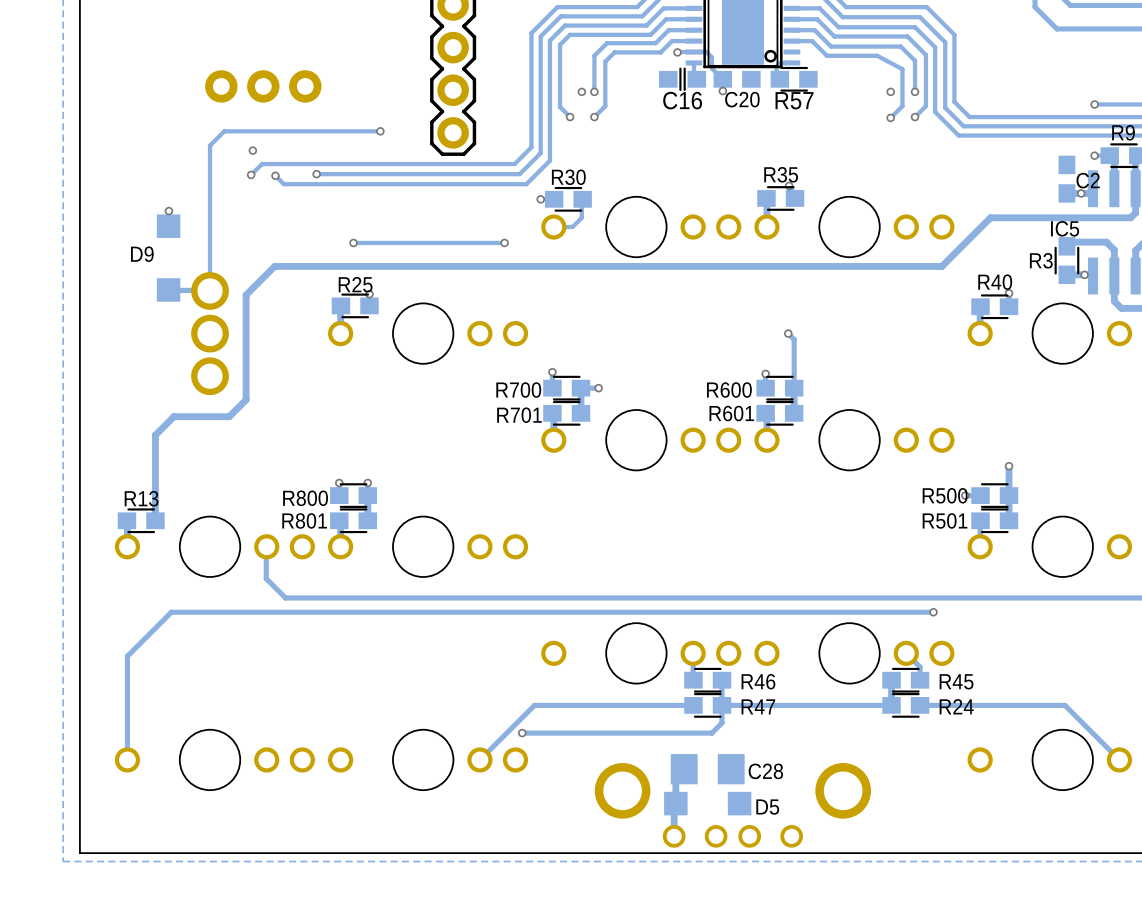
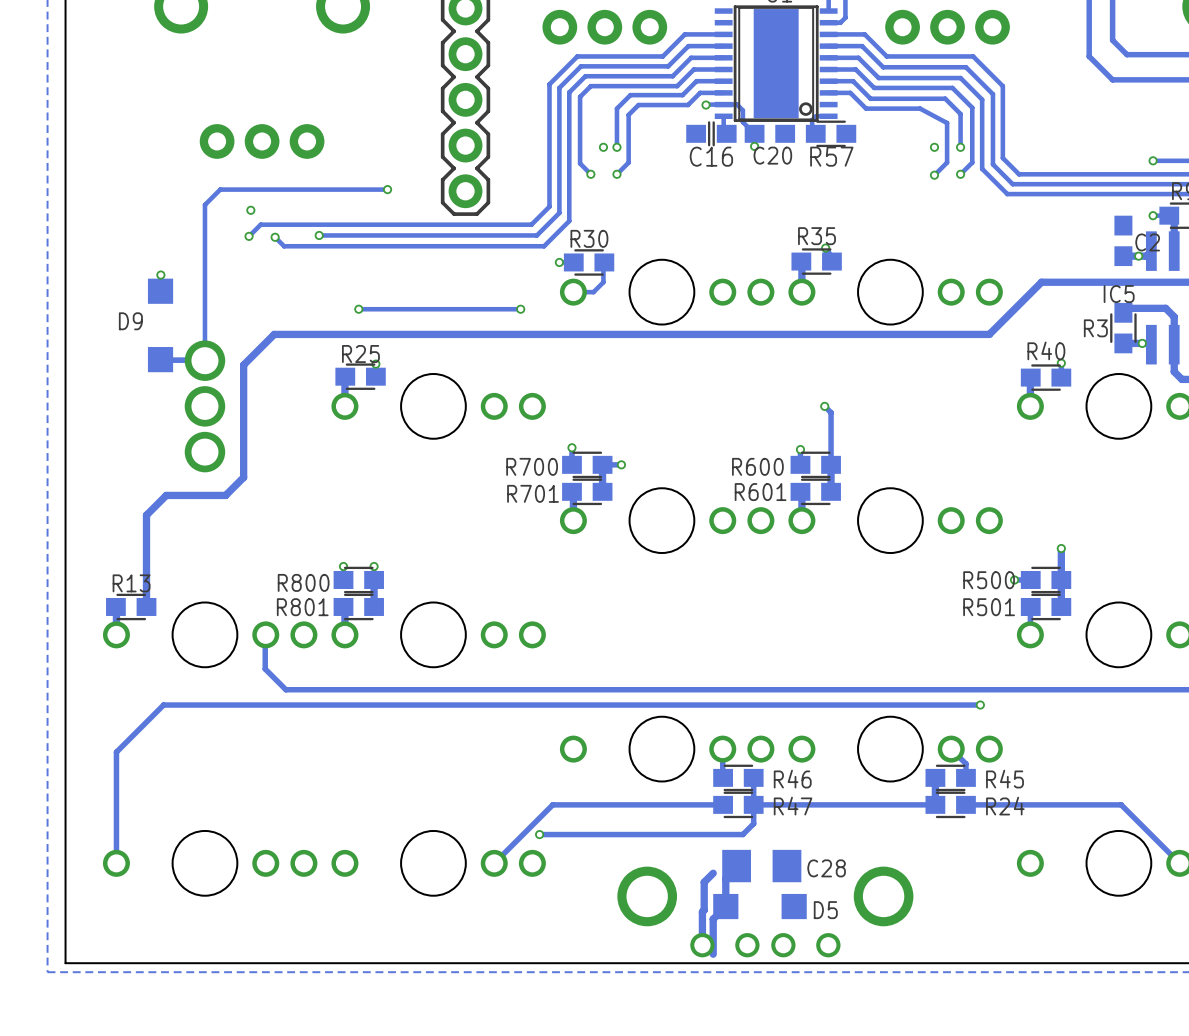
track: none -> (736, 866) (725, 878) (725, 906) (713, 919) (713, 954)
C28 position: (707, 769) -> (761, 866)
D5 position: (707, 803) -> (759, 906)

